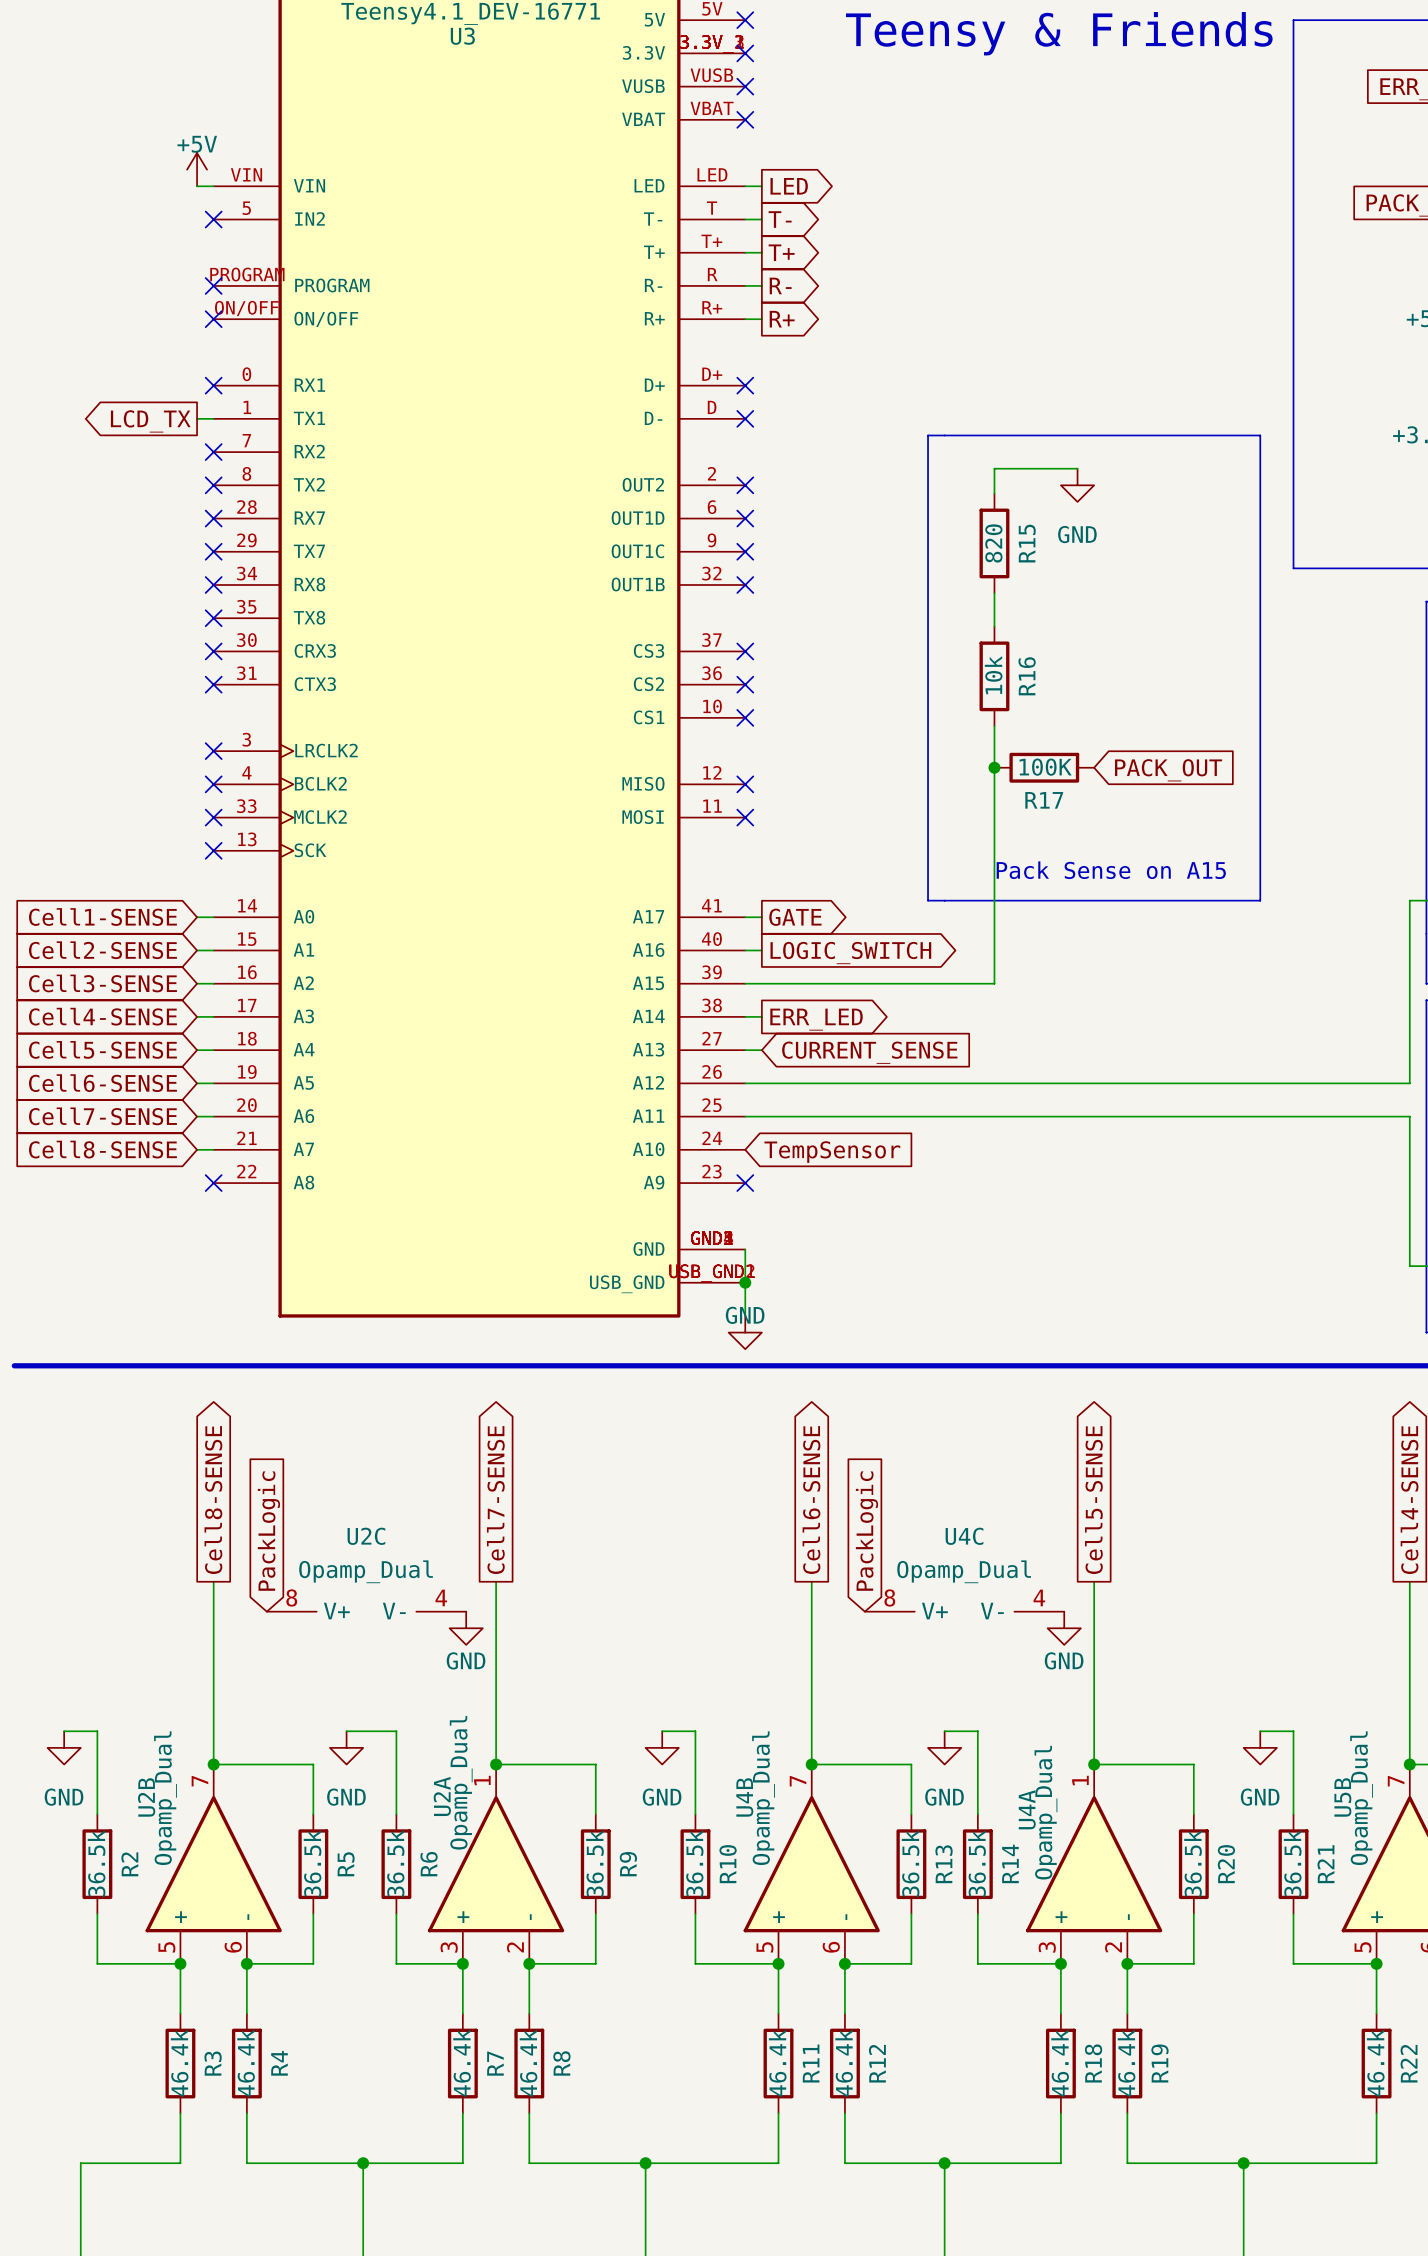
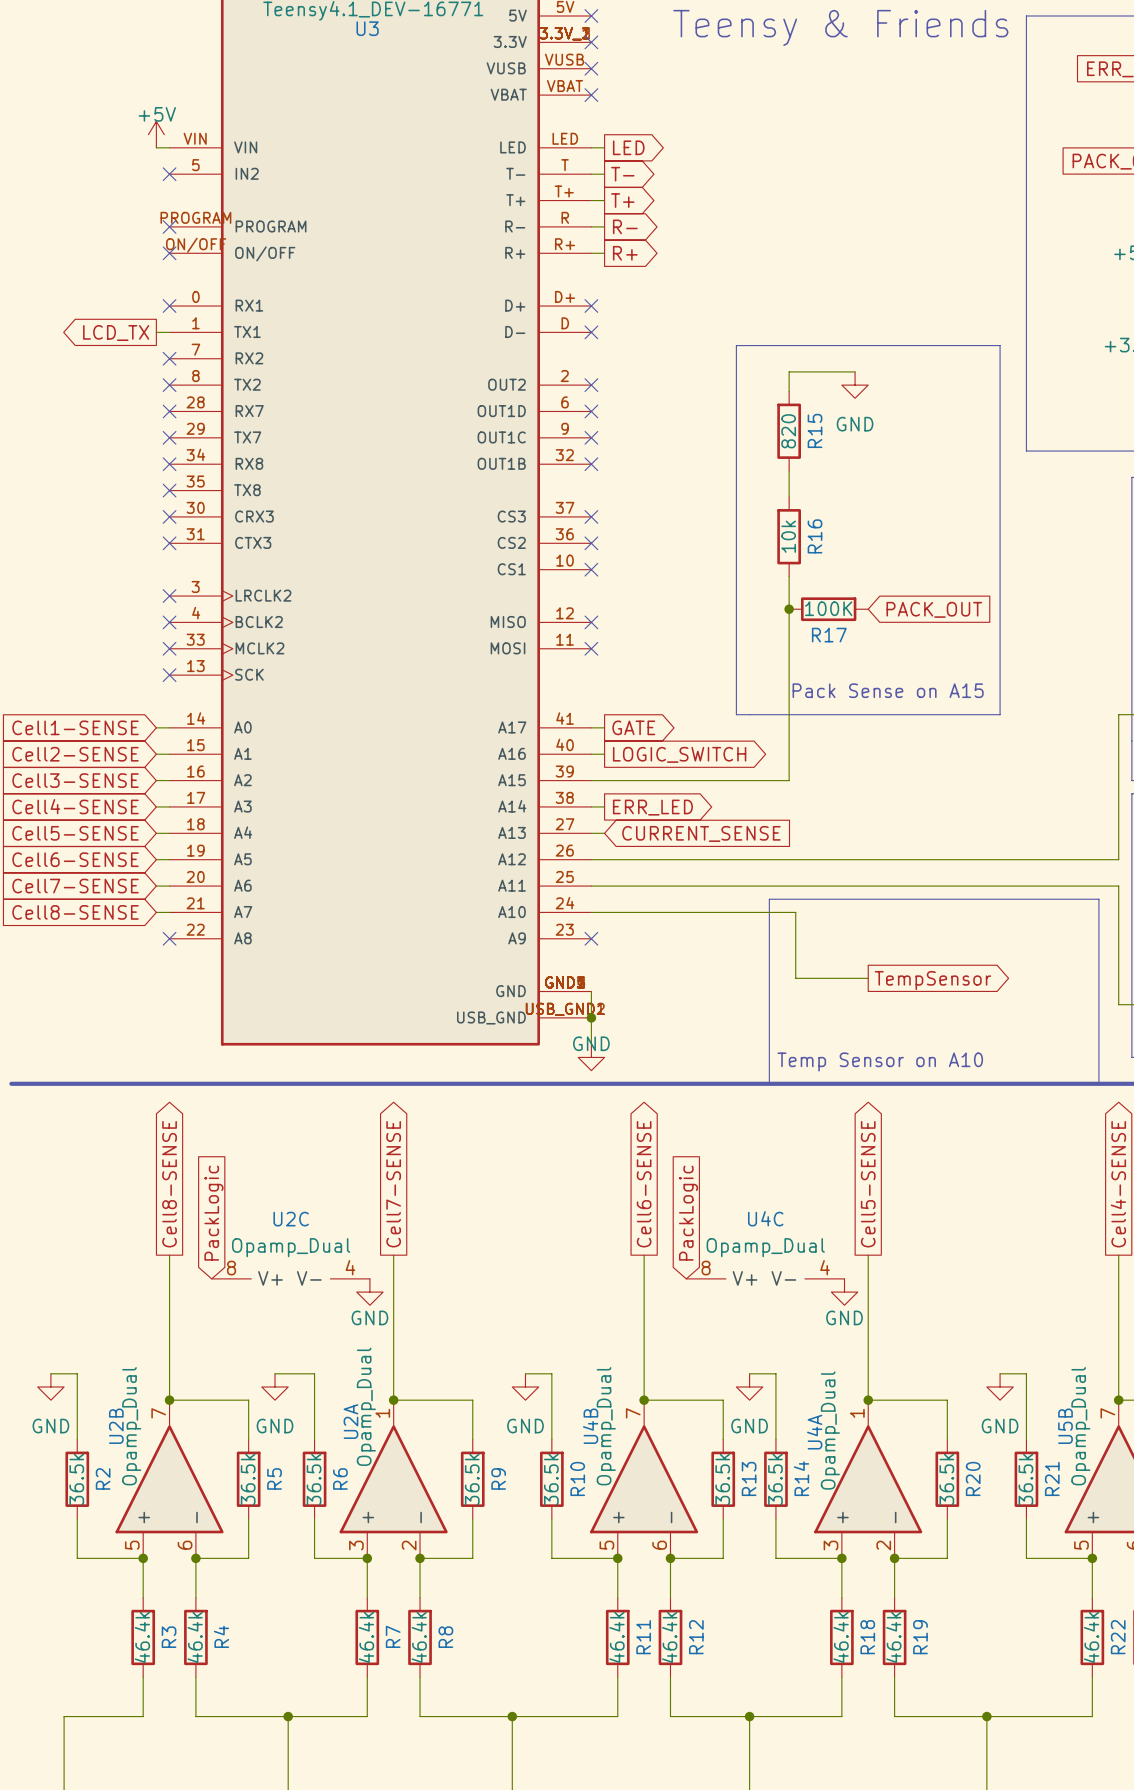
wire: none -> (591, 912) (795, 912) (795, 978) (868, 978)
global label: TempSensor (832, 1152) -> none
global label: none -> TempSensor (932, 980)
text: none -> Temp Sensor on A10 (880, 1062)
line: none -> (769, 1083) (769, 899) (1098, 899) (1098, 1083)

